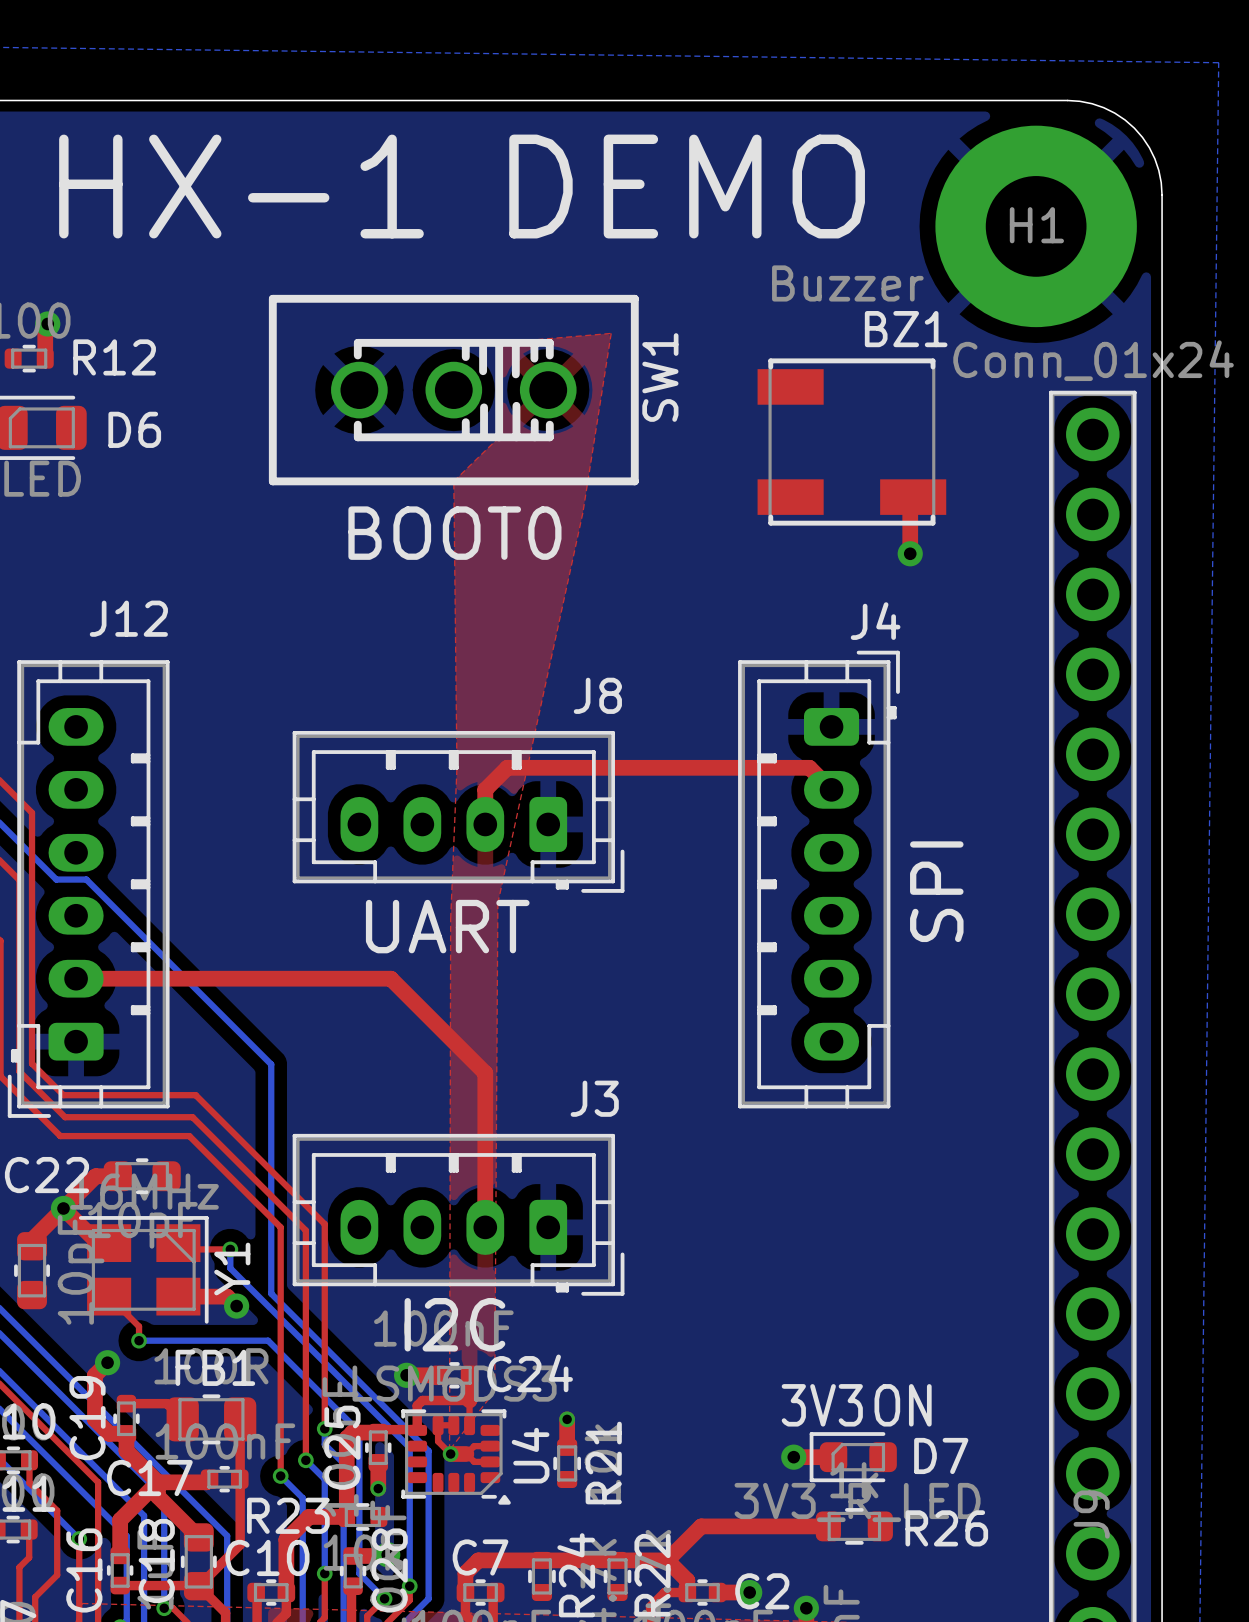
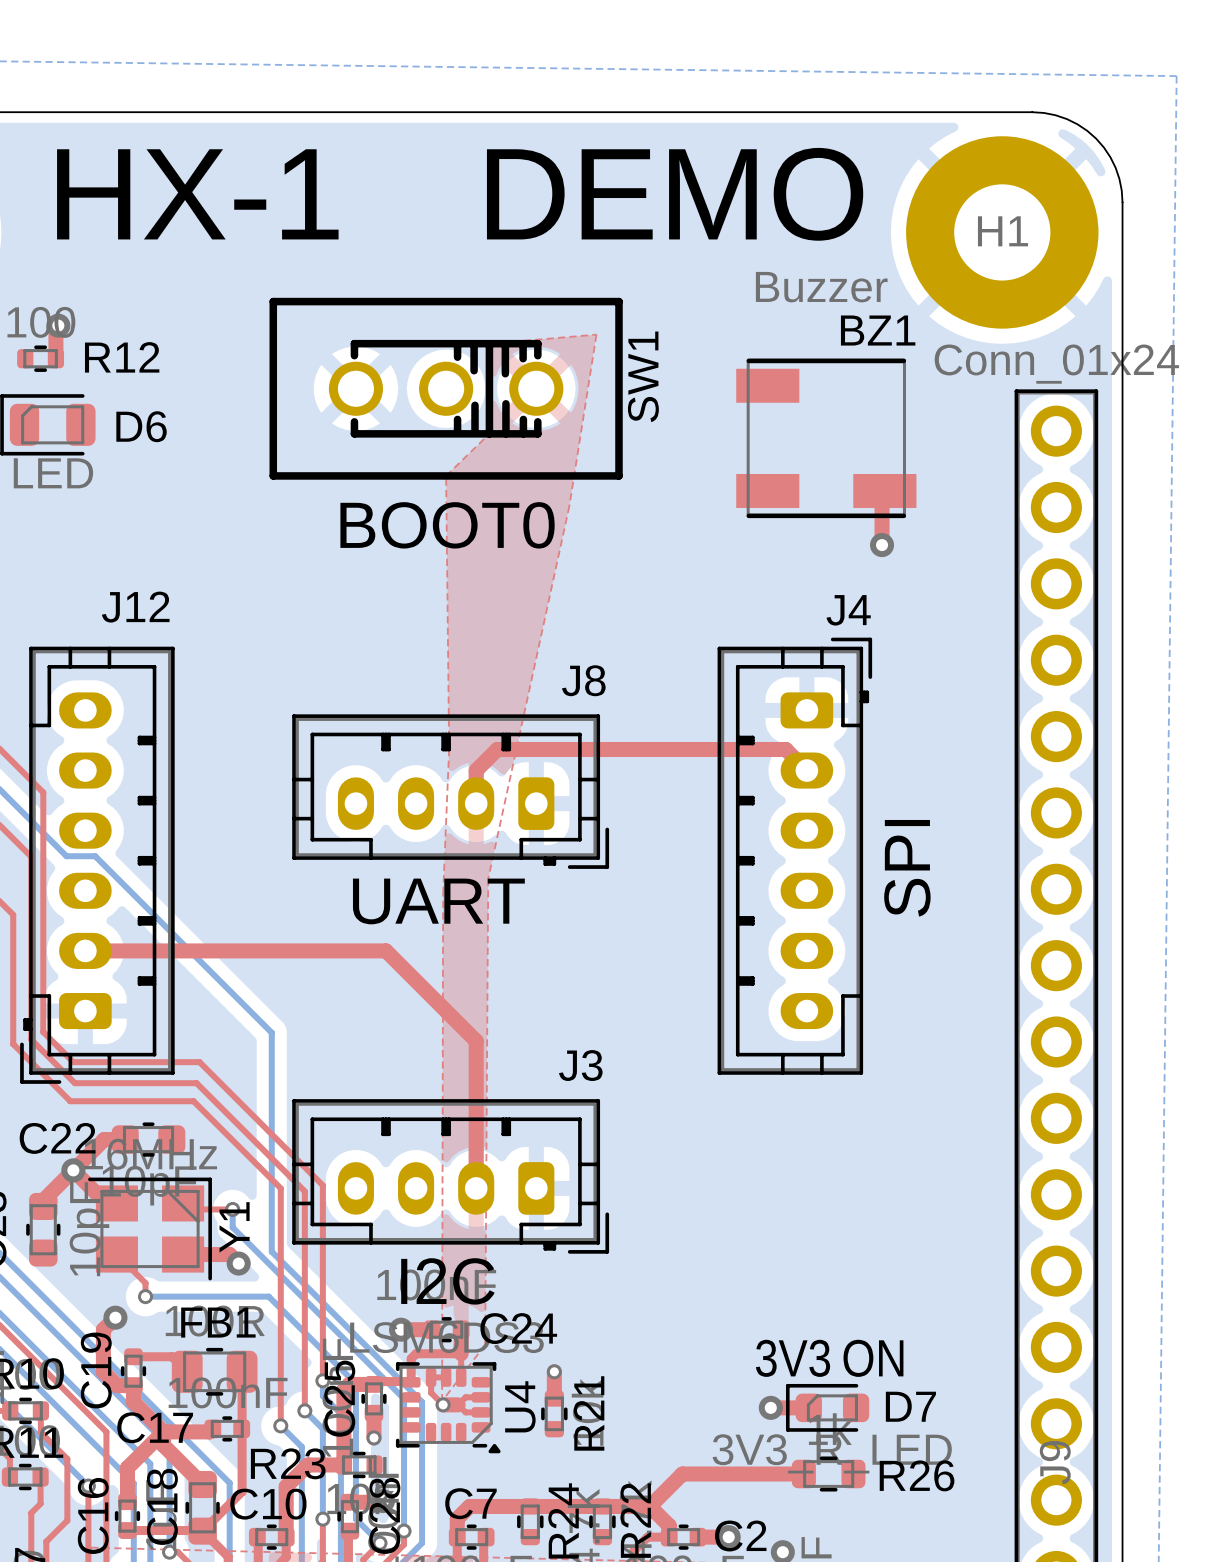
BZ1 footprint: [757, 358, 947, 526] -> [736, 358, 917, 519]

